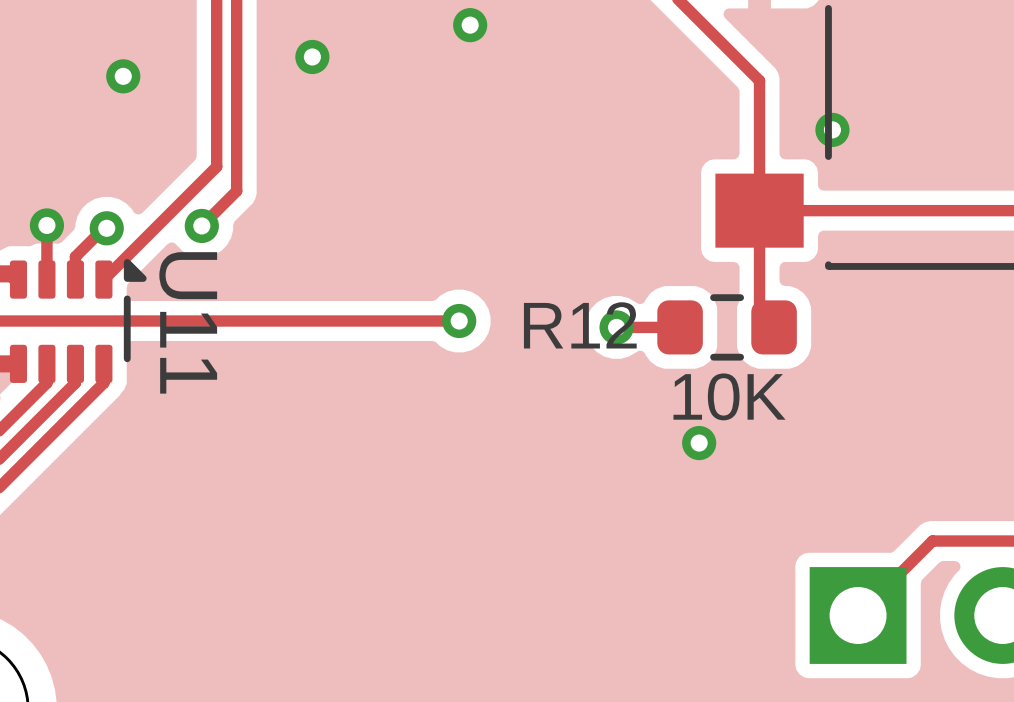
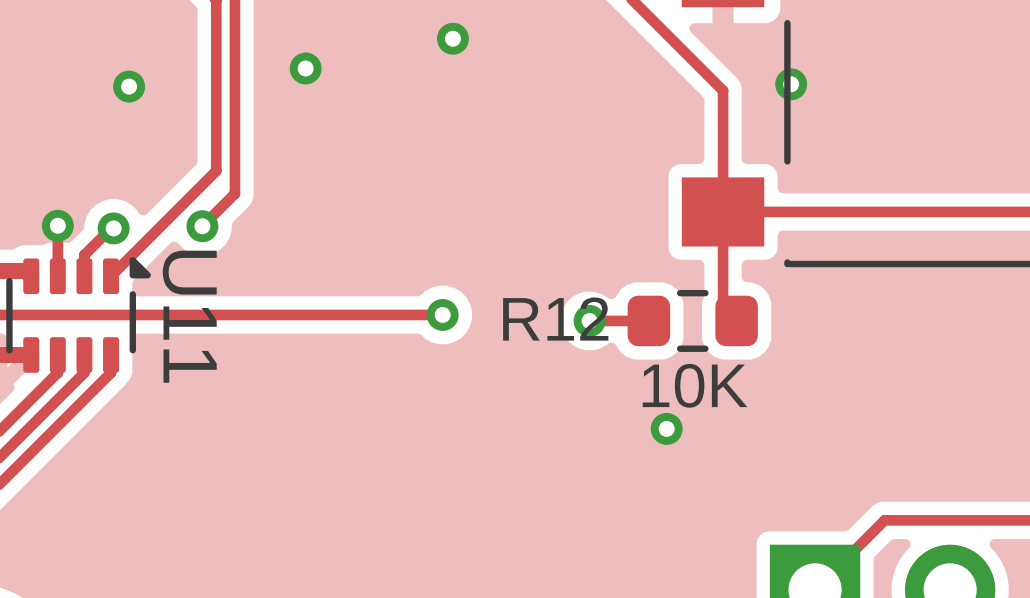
via position: (832, 129) -> (791, 84)

